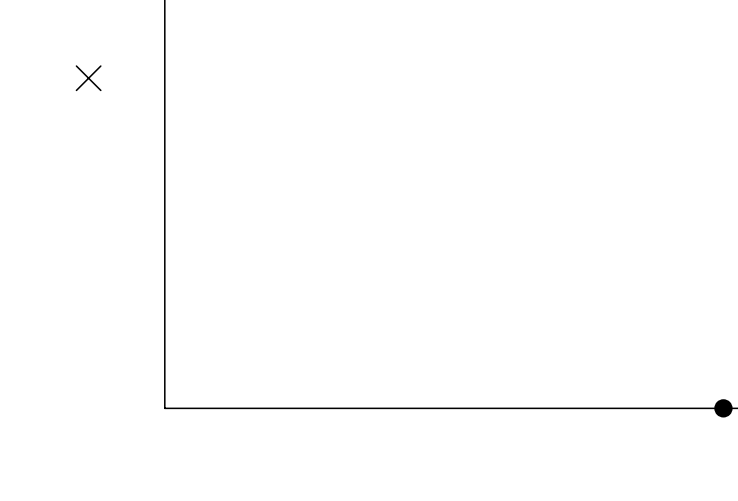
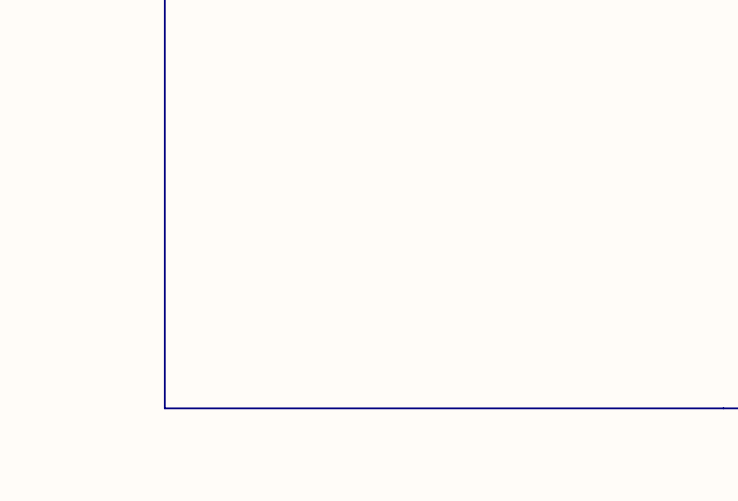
no-connect mark: (88, 78) -> none
junction: (723, 408) -> none

